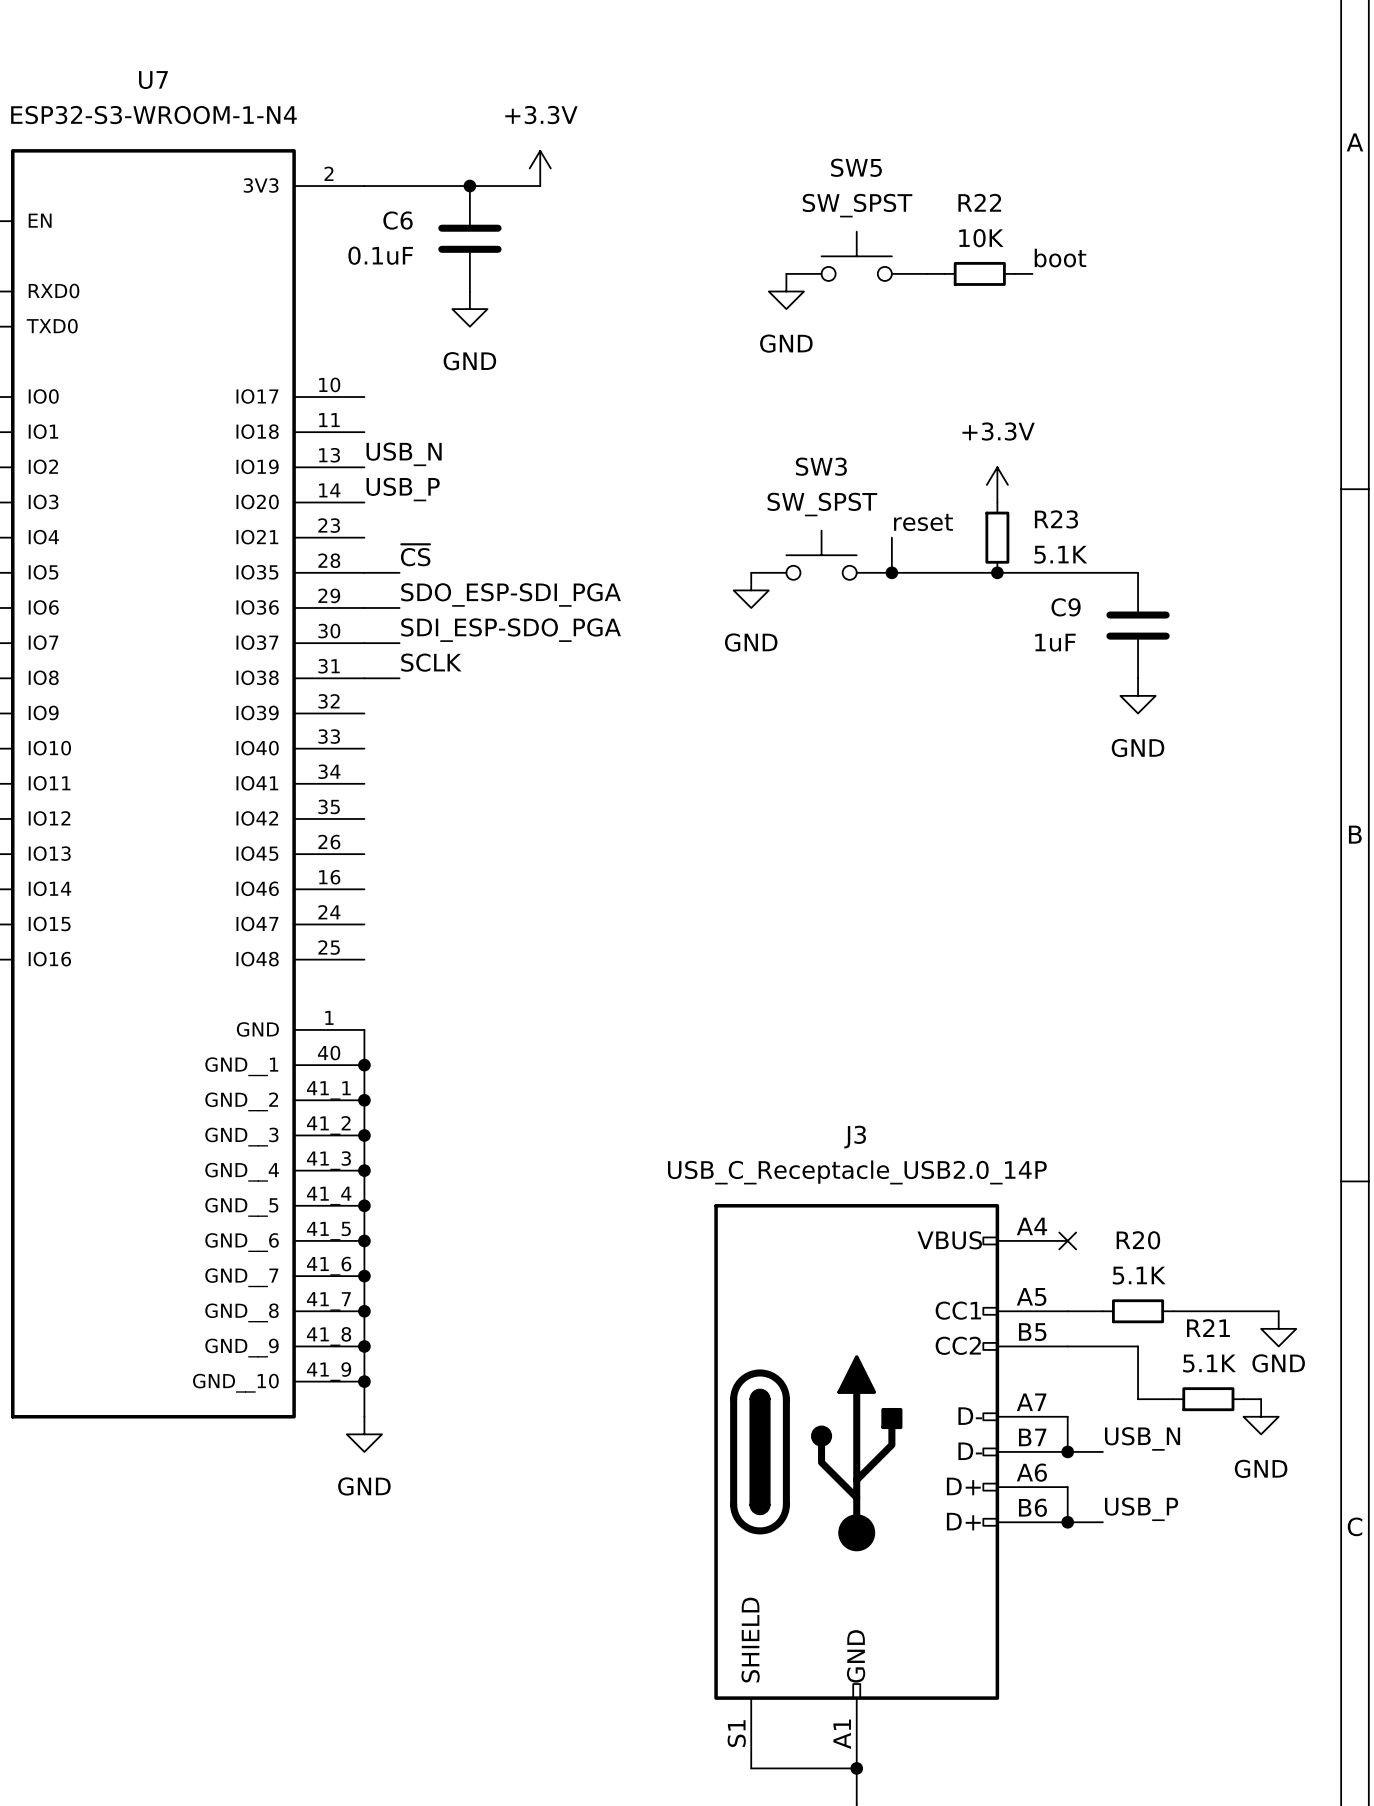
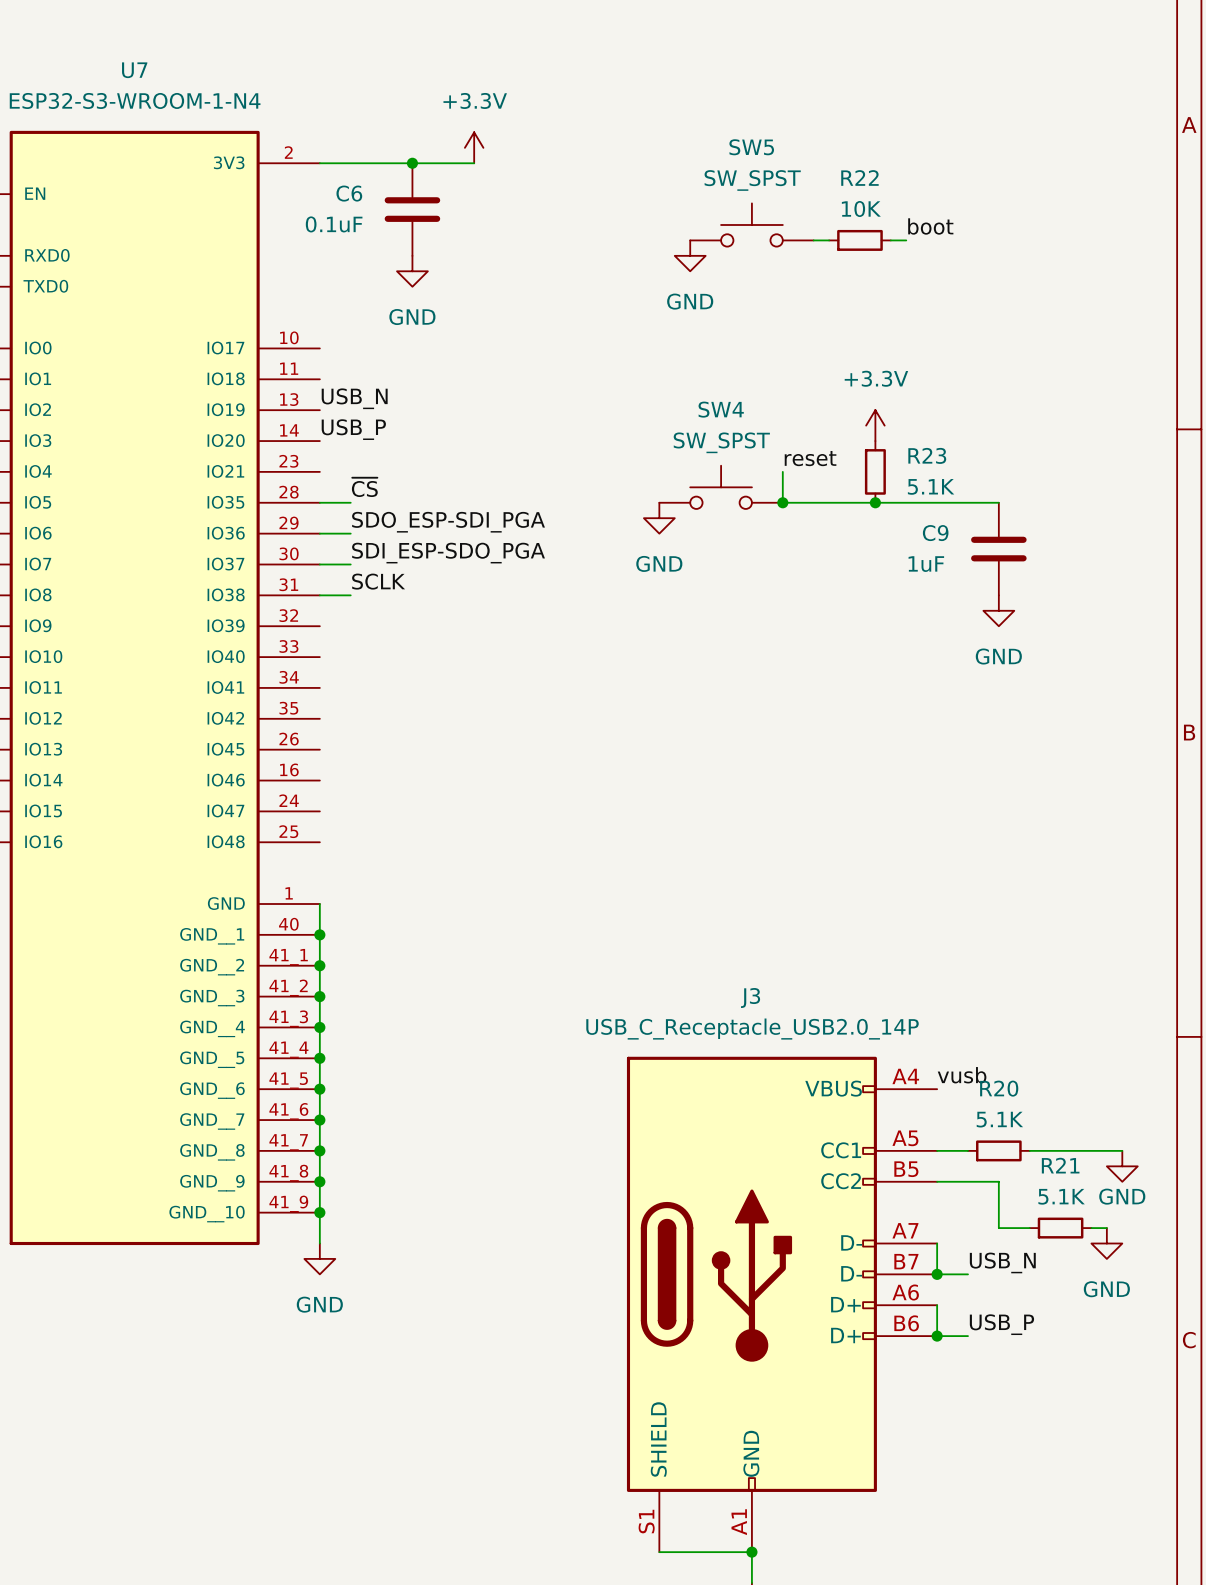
SW3 name: SW3 (821, 466) -> SW4 (721, 409)
label: none -> vusb (962, 1075)
no-connect mark: (1067, 1240) -> none

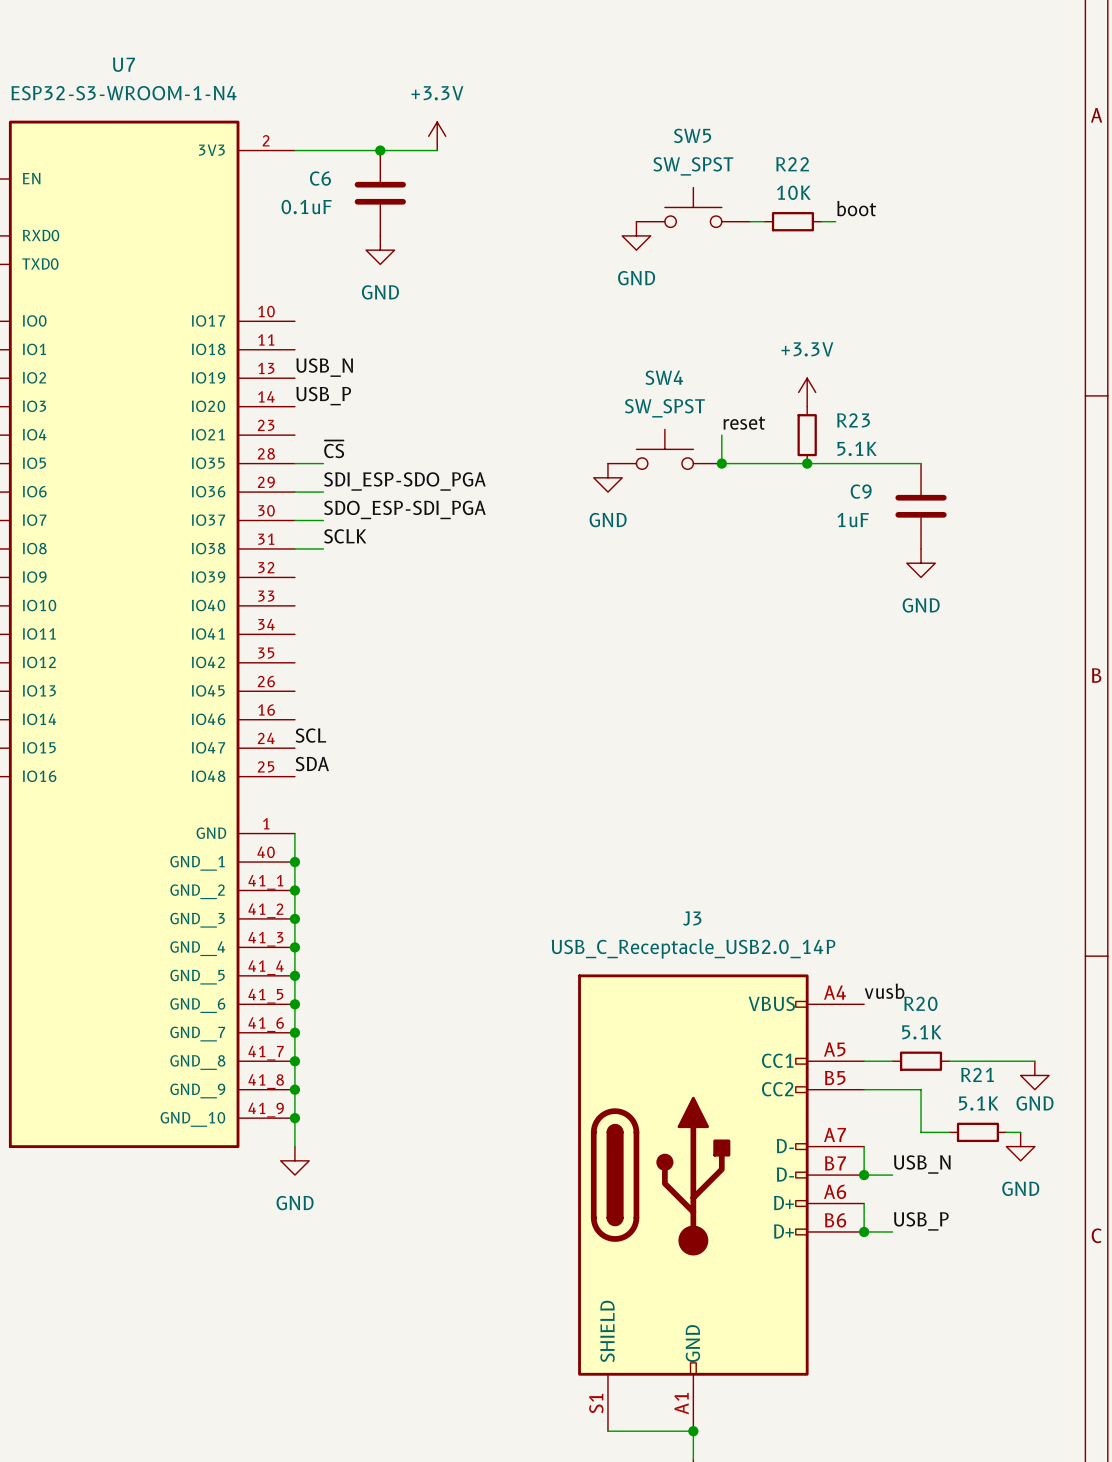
label: SDO_ESP-SDI_PGA (448, 522) -> SDI_ESP-SDO_PGA (404, 481)
label: SDI_ESP-SDO_PGA (448, 553) -> SDO_ESP-SDI_PGA (404, 509)
label: none -> SCL (310, 735)
label: none -> SDA (312, 764)

